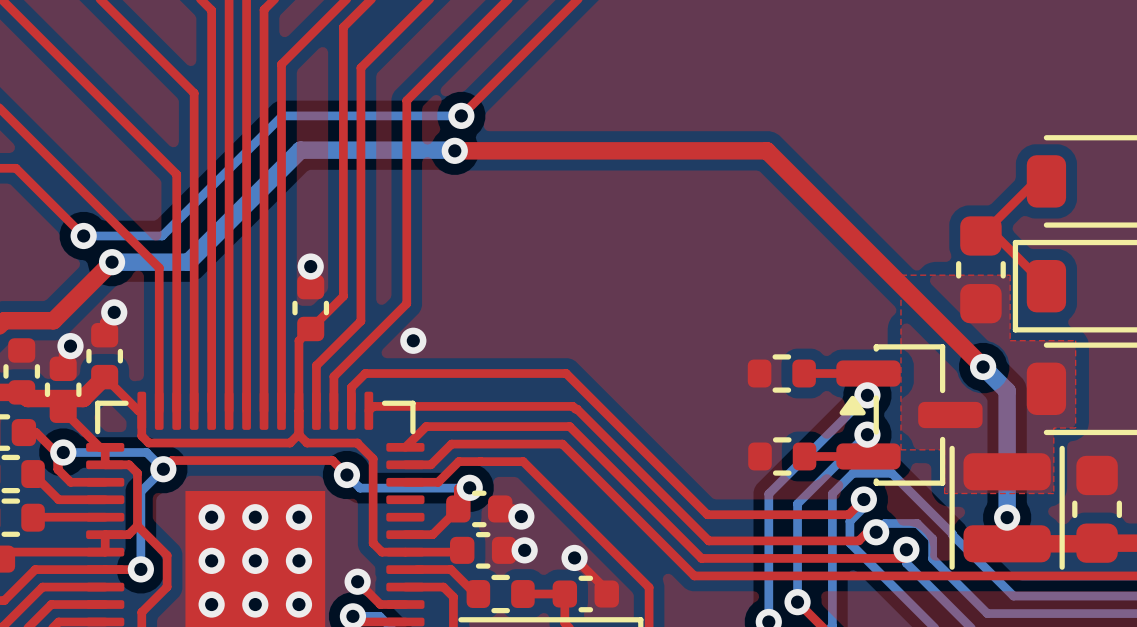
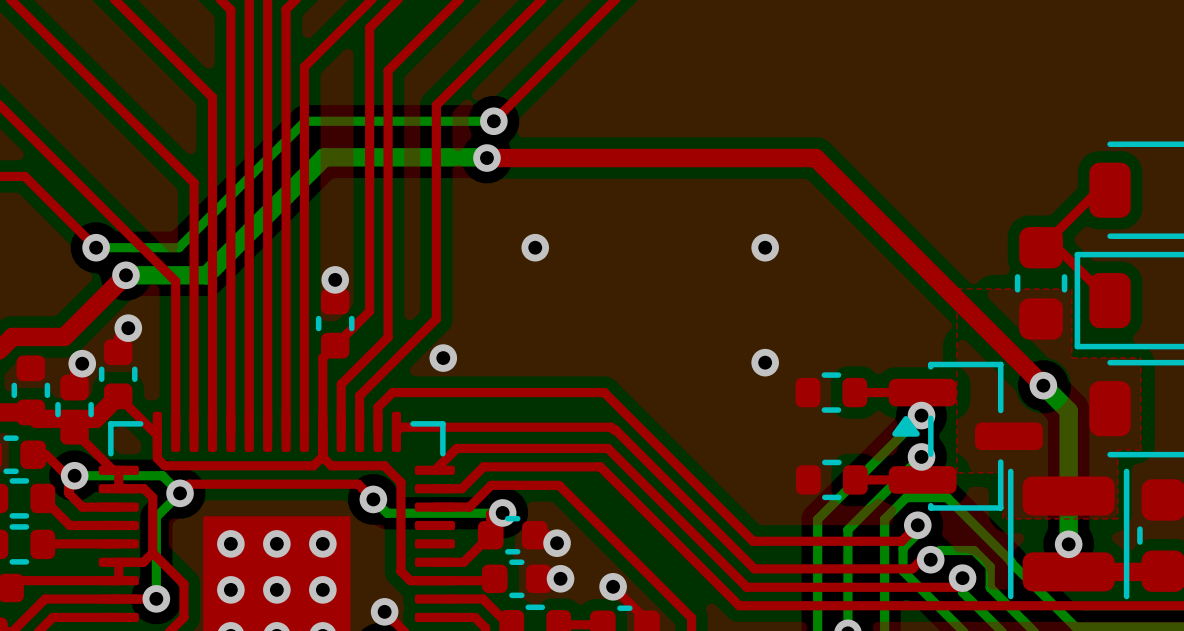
via: none -> (535, 247)
via: none -> (765, 247)
via: none -> (765, 362)

